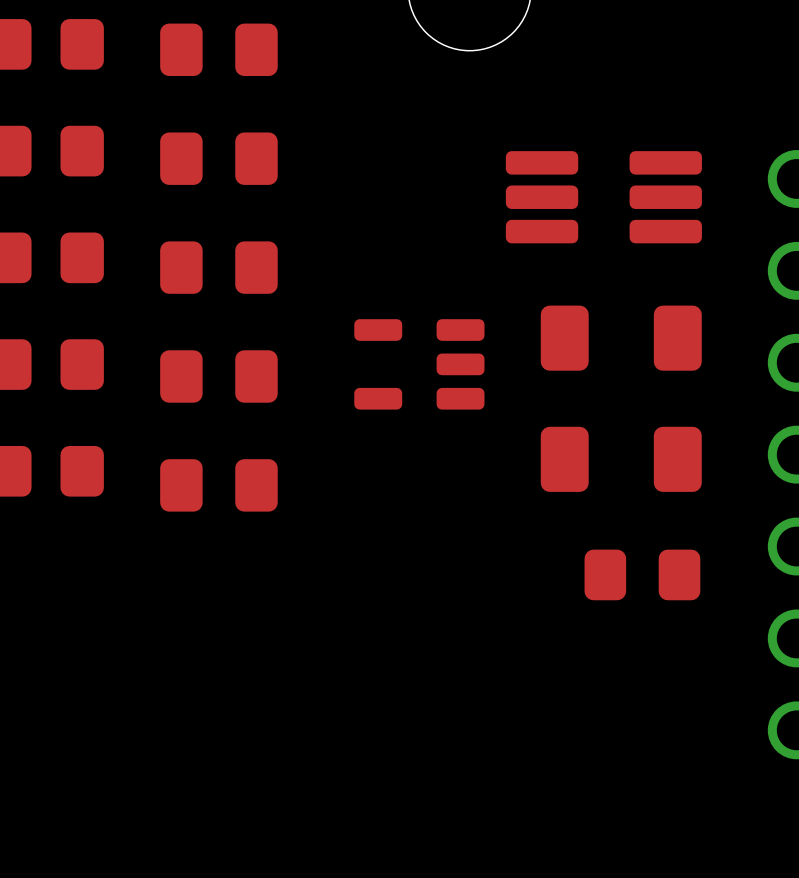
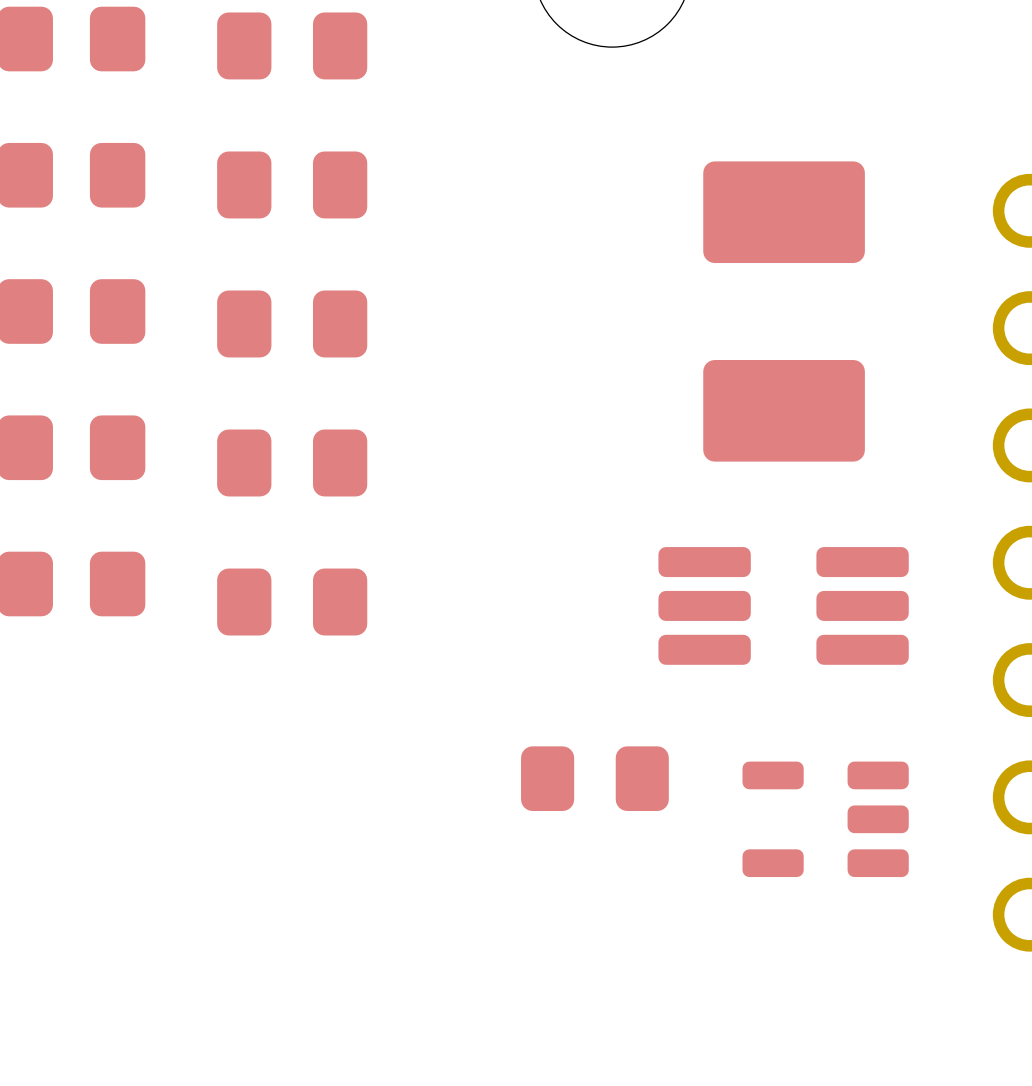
part: (603, 197) -> none
part: none -> (784, 311)
part: (621, 338) -> none
part position: (419, 364) -> (825, 819)
part footprint: [540, 426, 702, 492] -> [658, 547, 909, 665]
part position: (642, 574) -> (594, 778)

